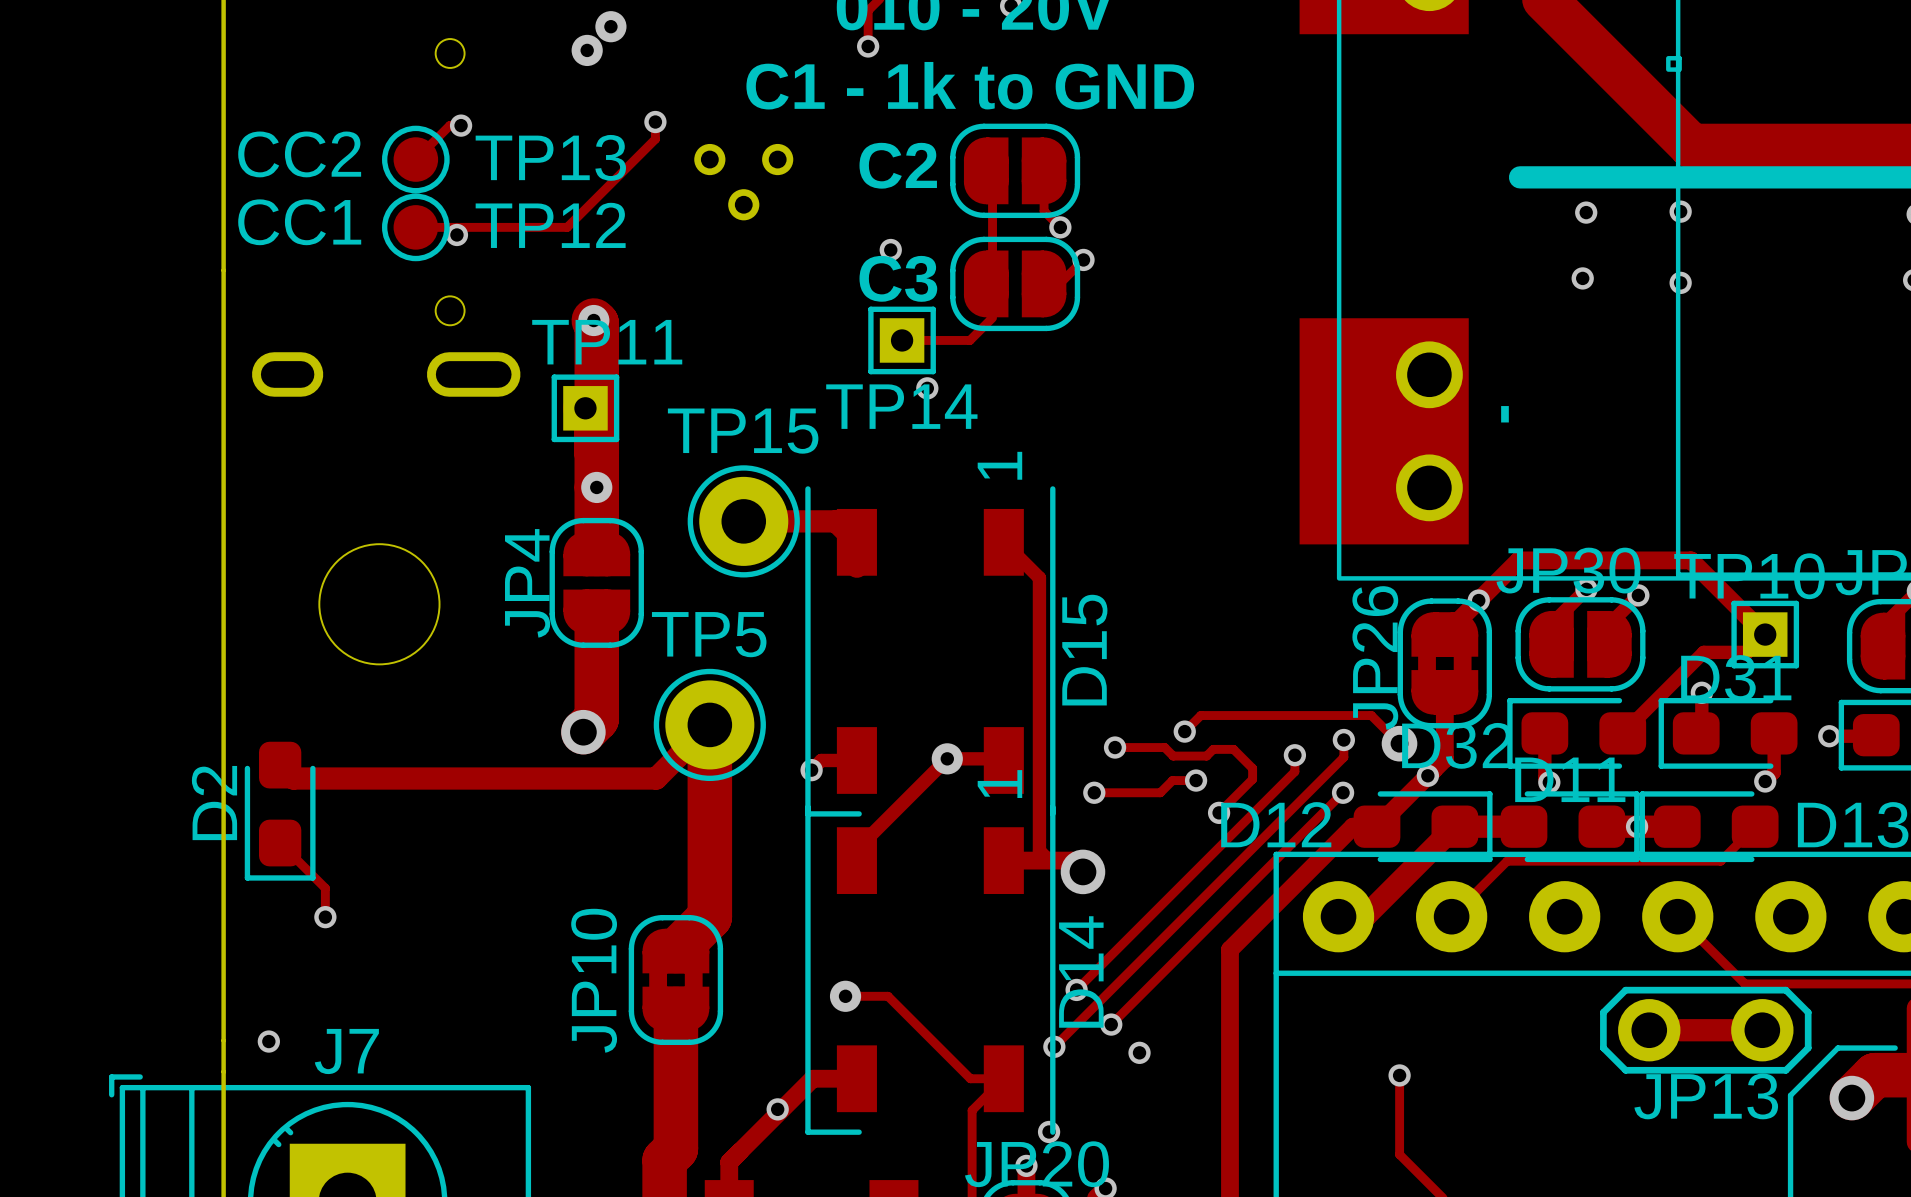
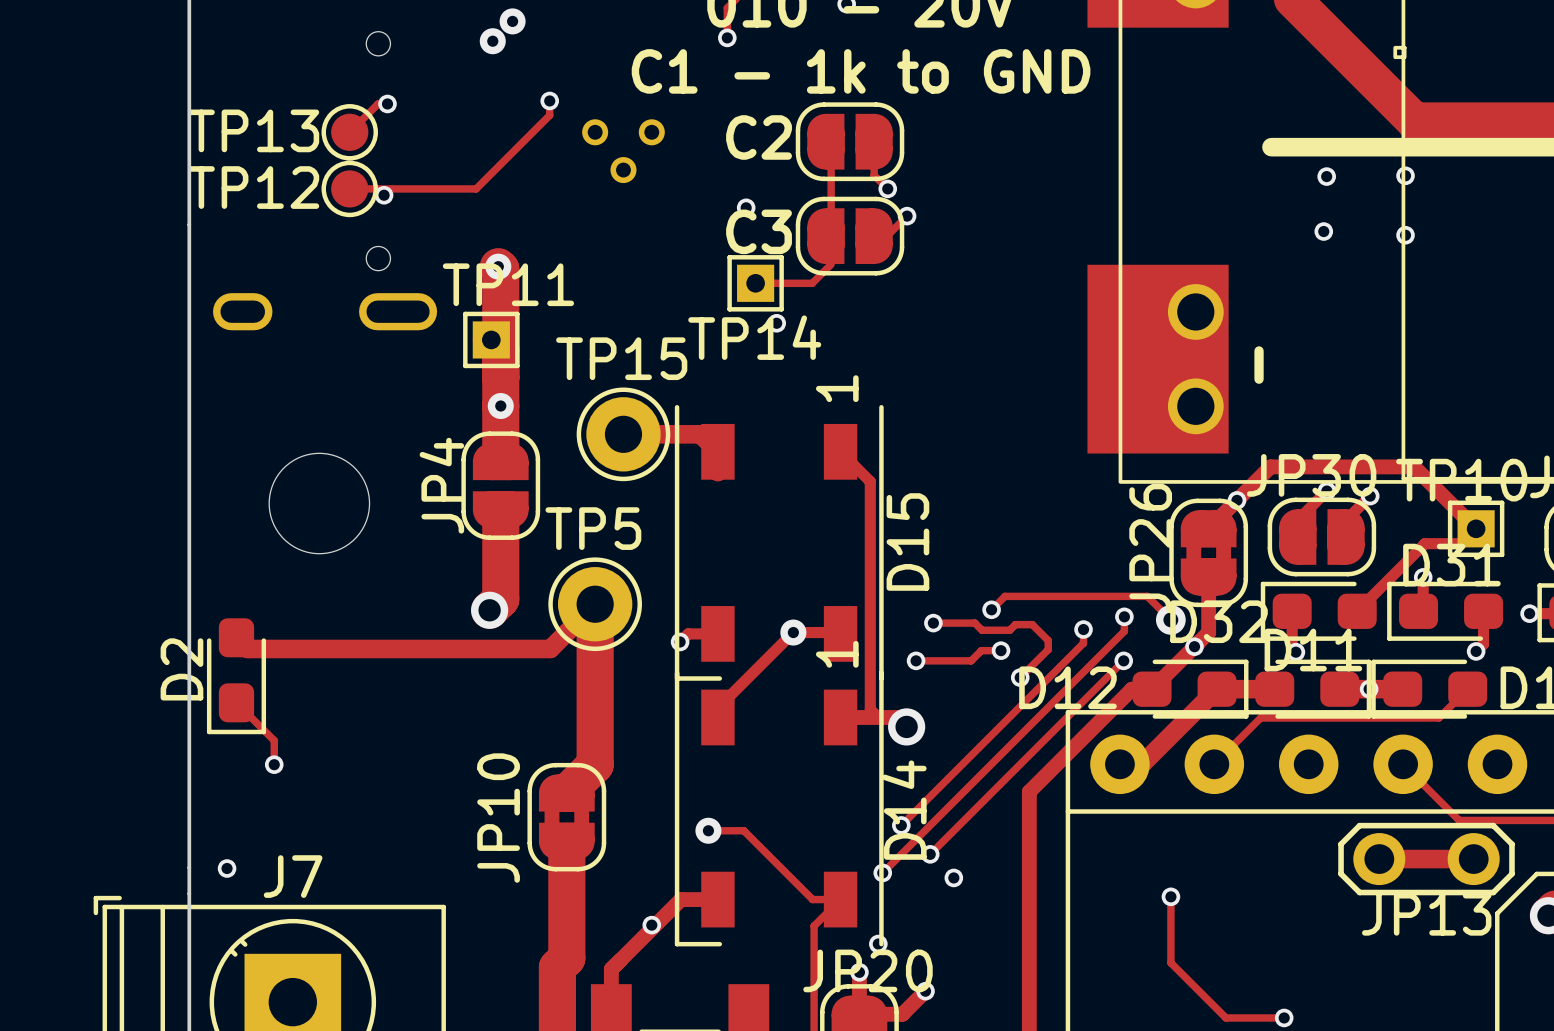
text: CC2 (299, 154) -> none
TP13 name position: TP13 (550, 157) -> TP13 (253, 130)
text: CC1 (299, 222) -> none
TP12 name position: TP12 (550, 225) -> TP12 (253, 187)

